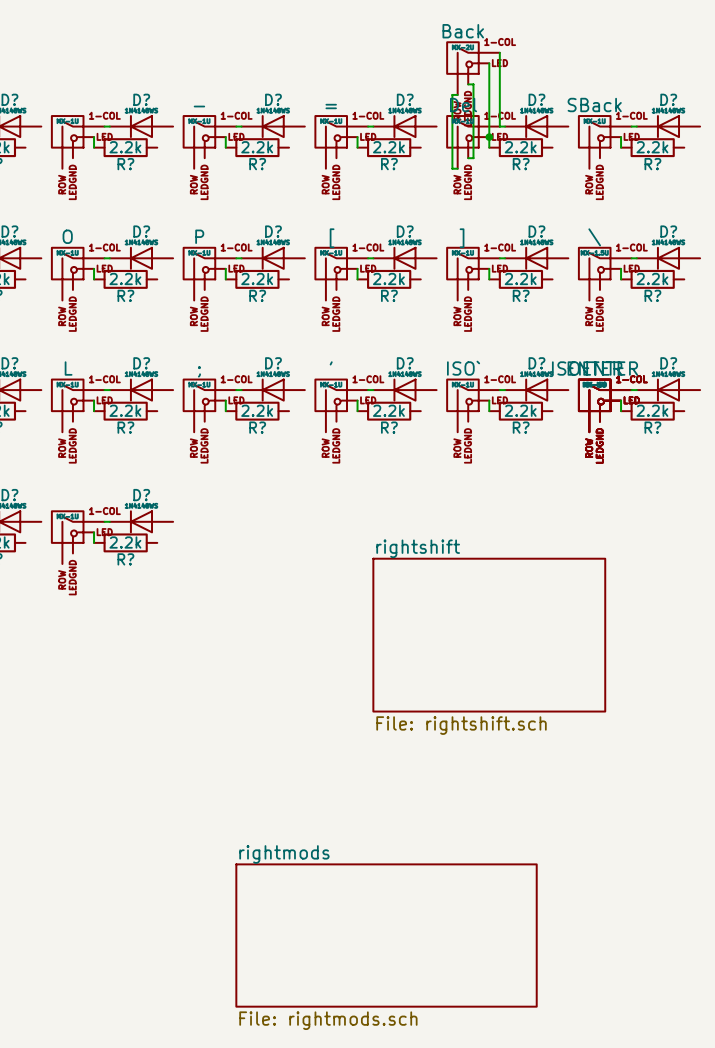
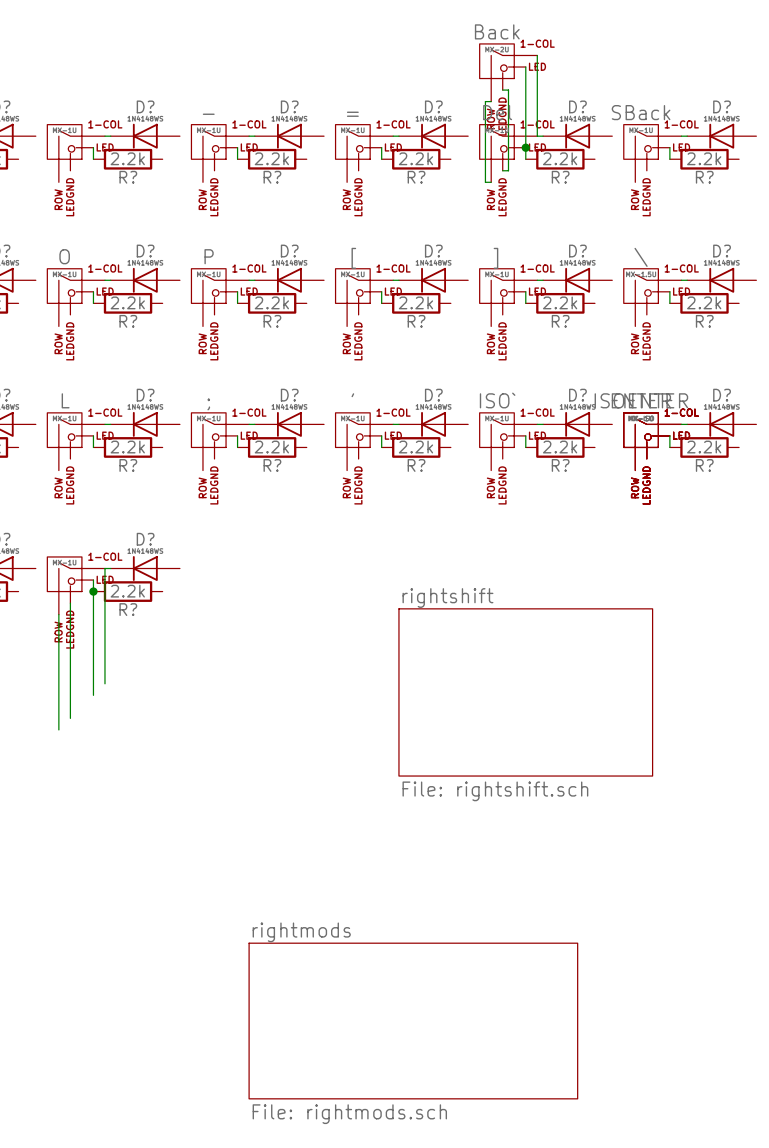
wire: none -> (104, 568) (104, 683)
wire: none -> (93, 591) (93, 695)
junction: none -> (93, 591)
wire: none -> (70, 603) (70, 718)
wire: none -> (58, 614) (58, 729)

